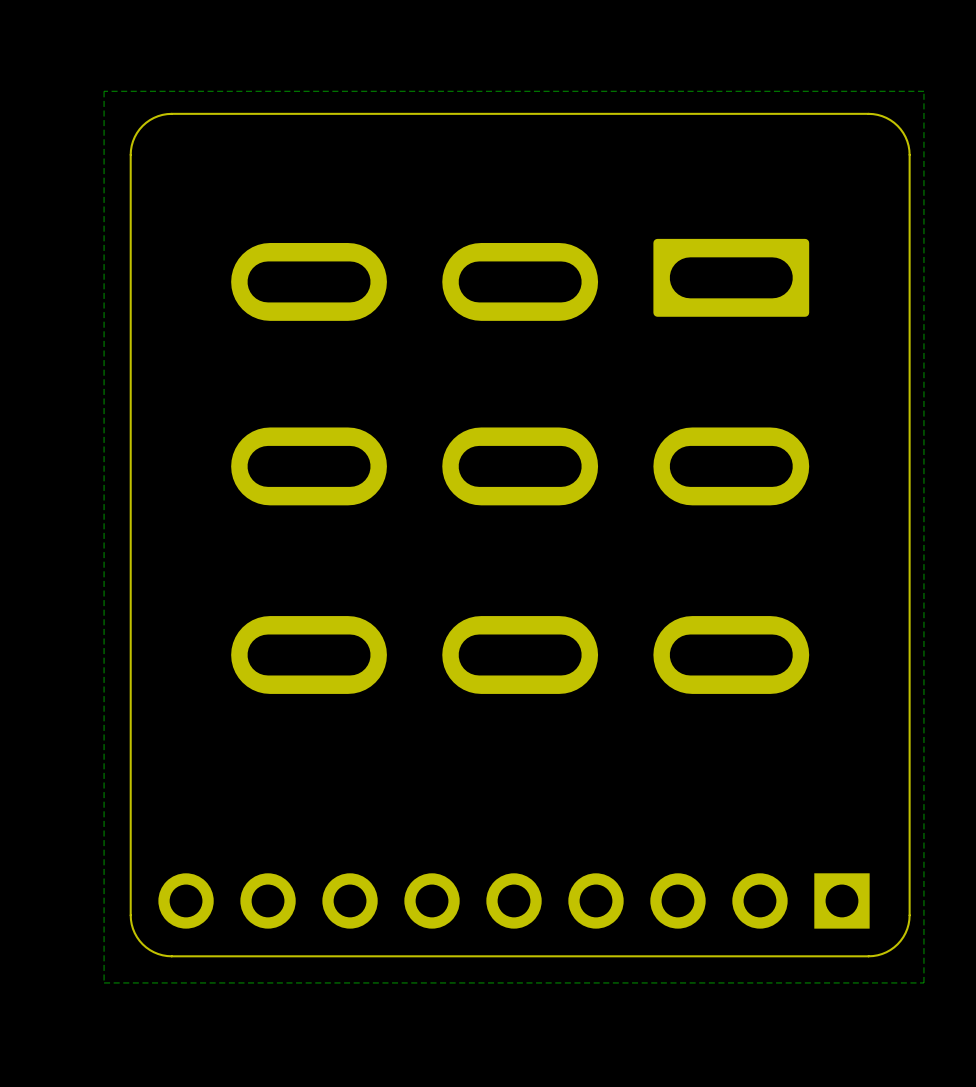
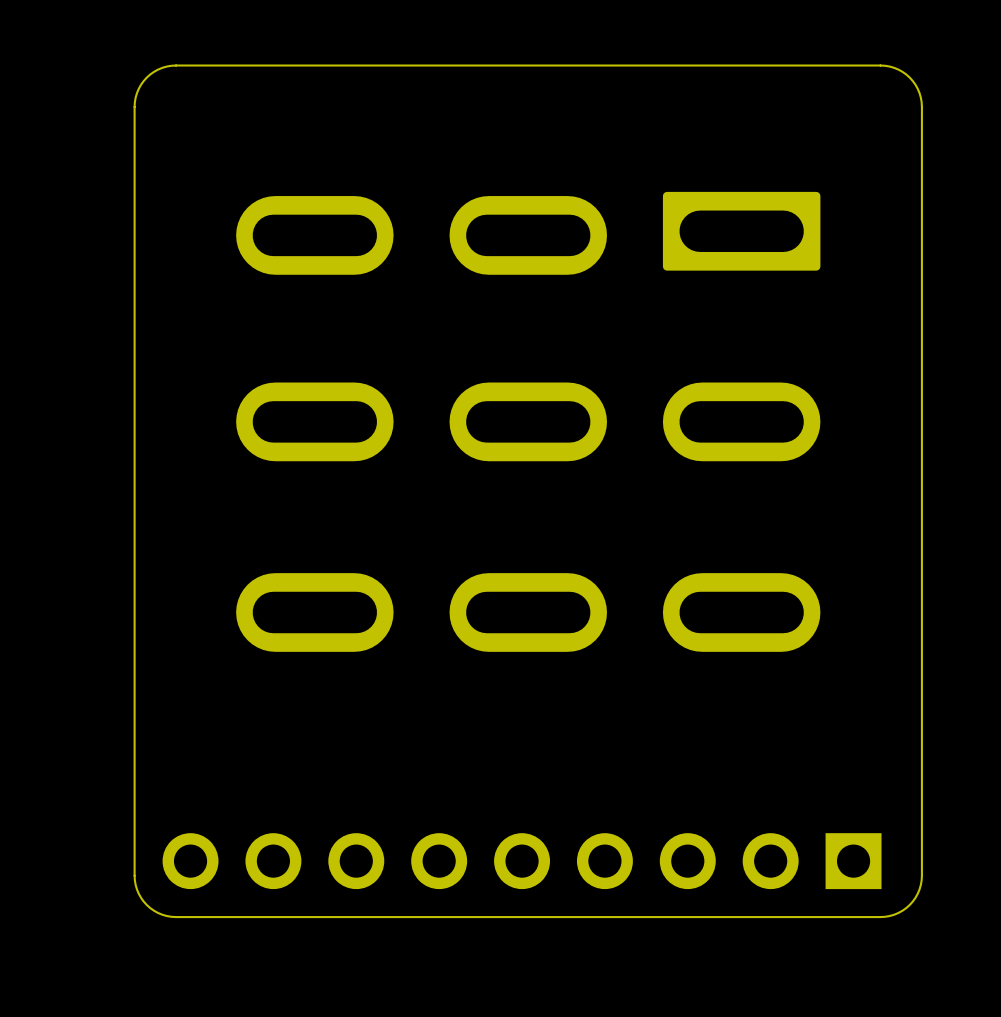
zone outline: (923, 91) (923, 982) (104, 982) (104, 91) (923, 91) -> none

